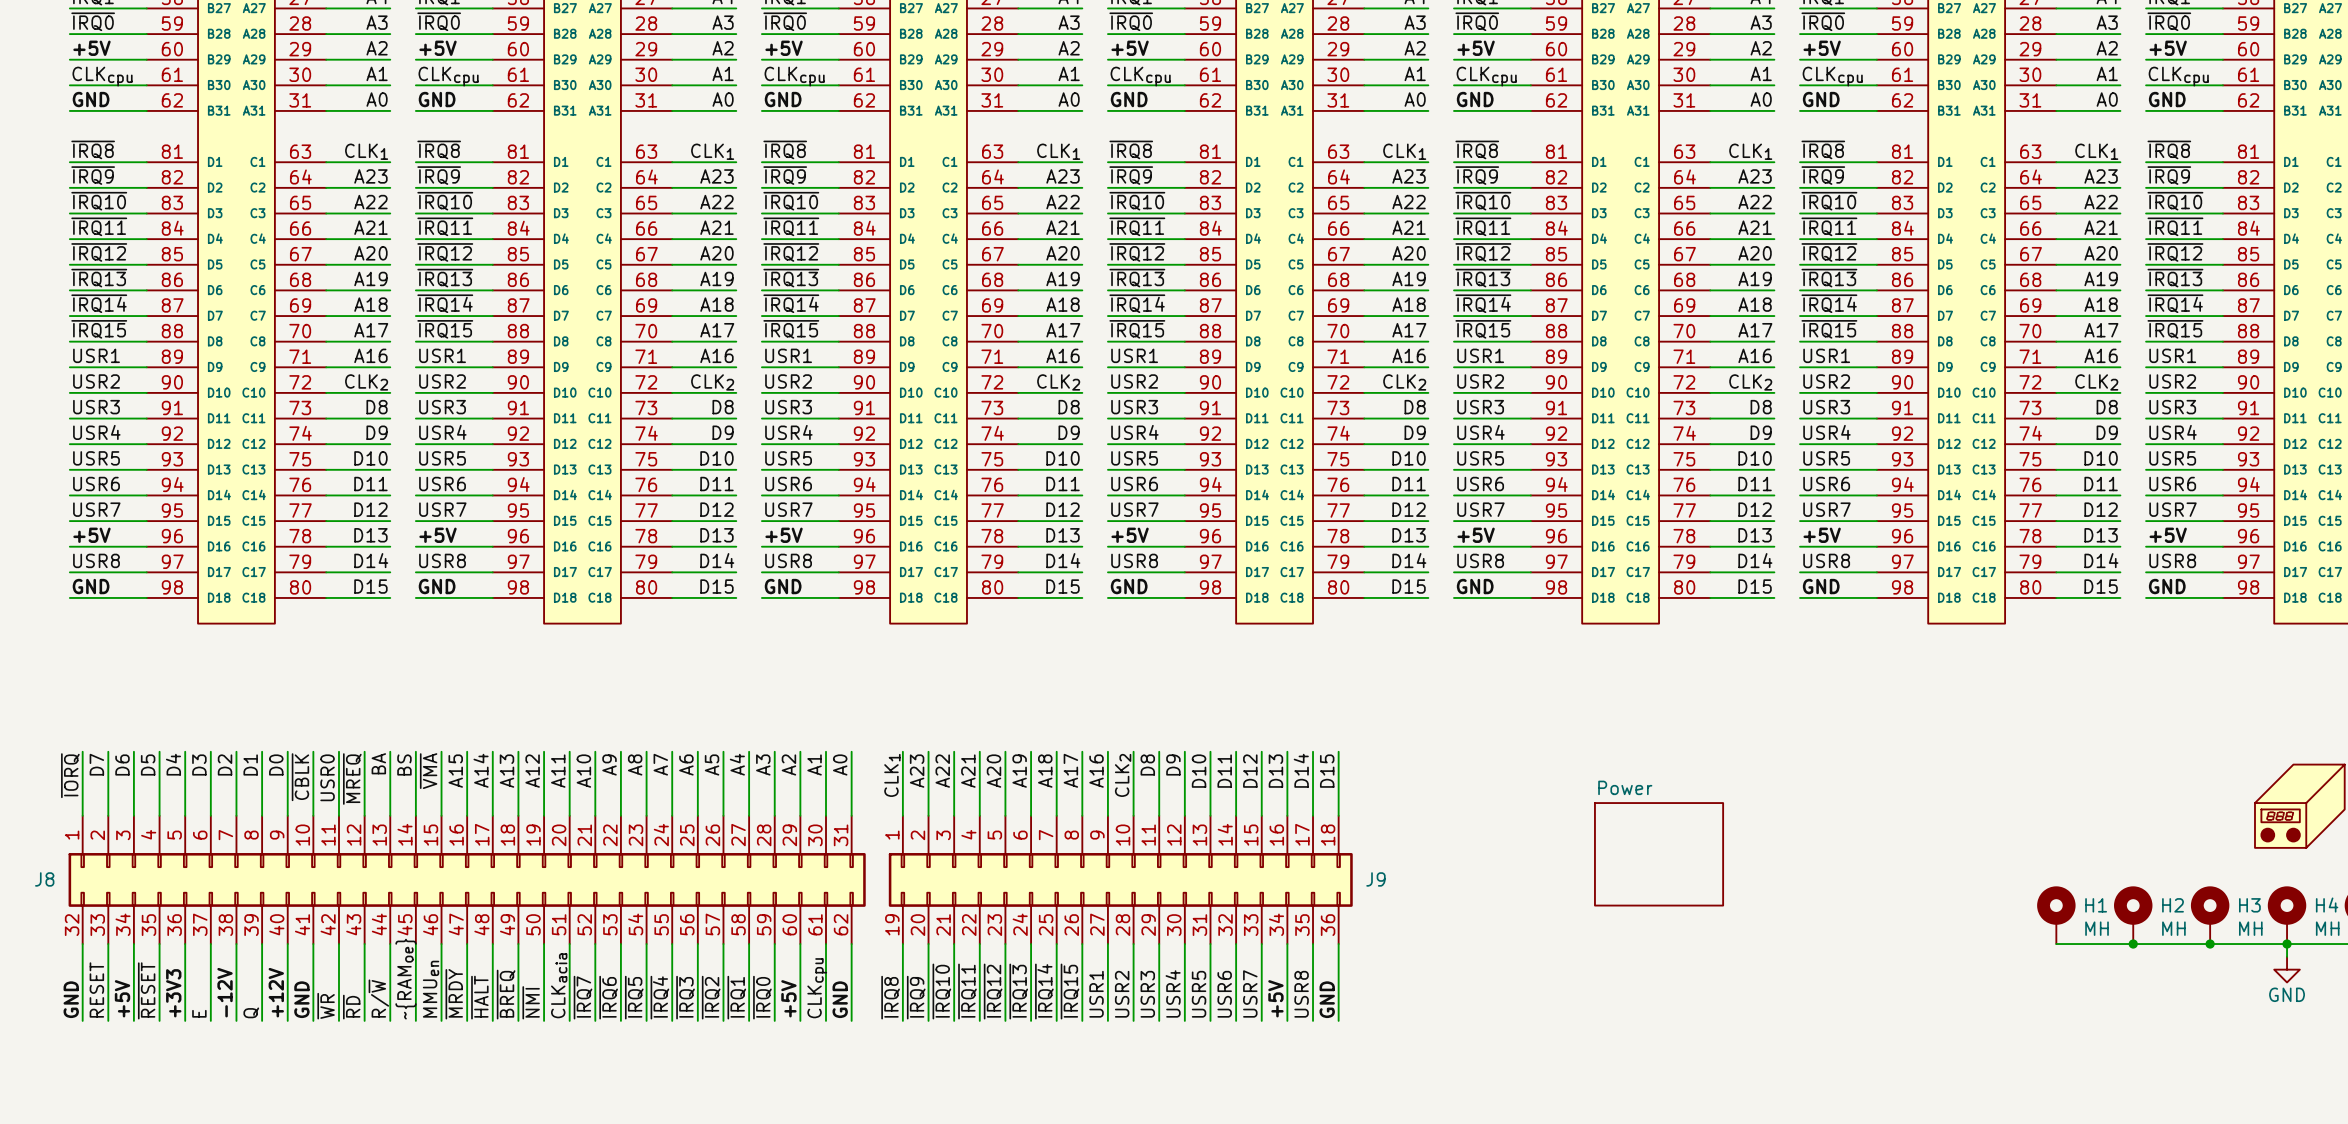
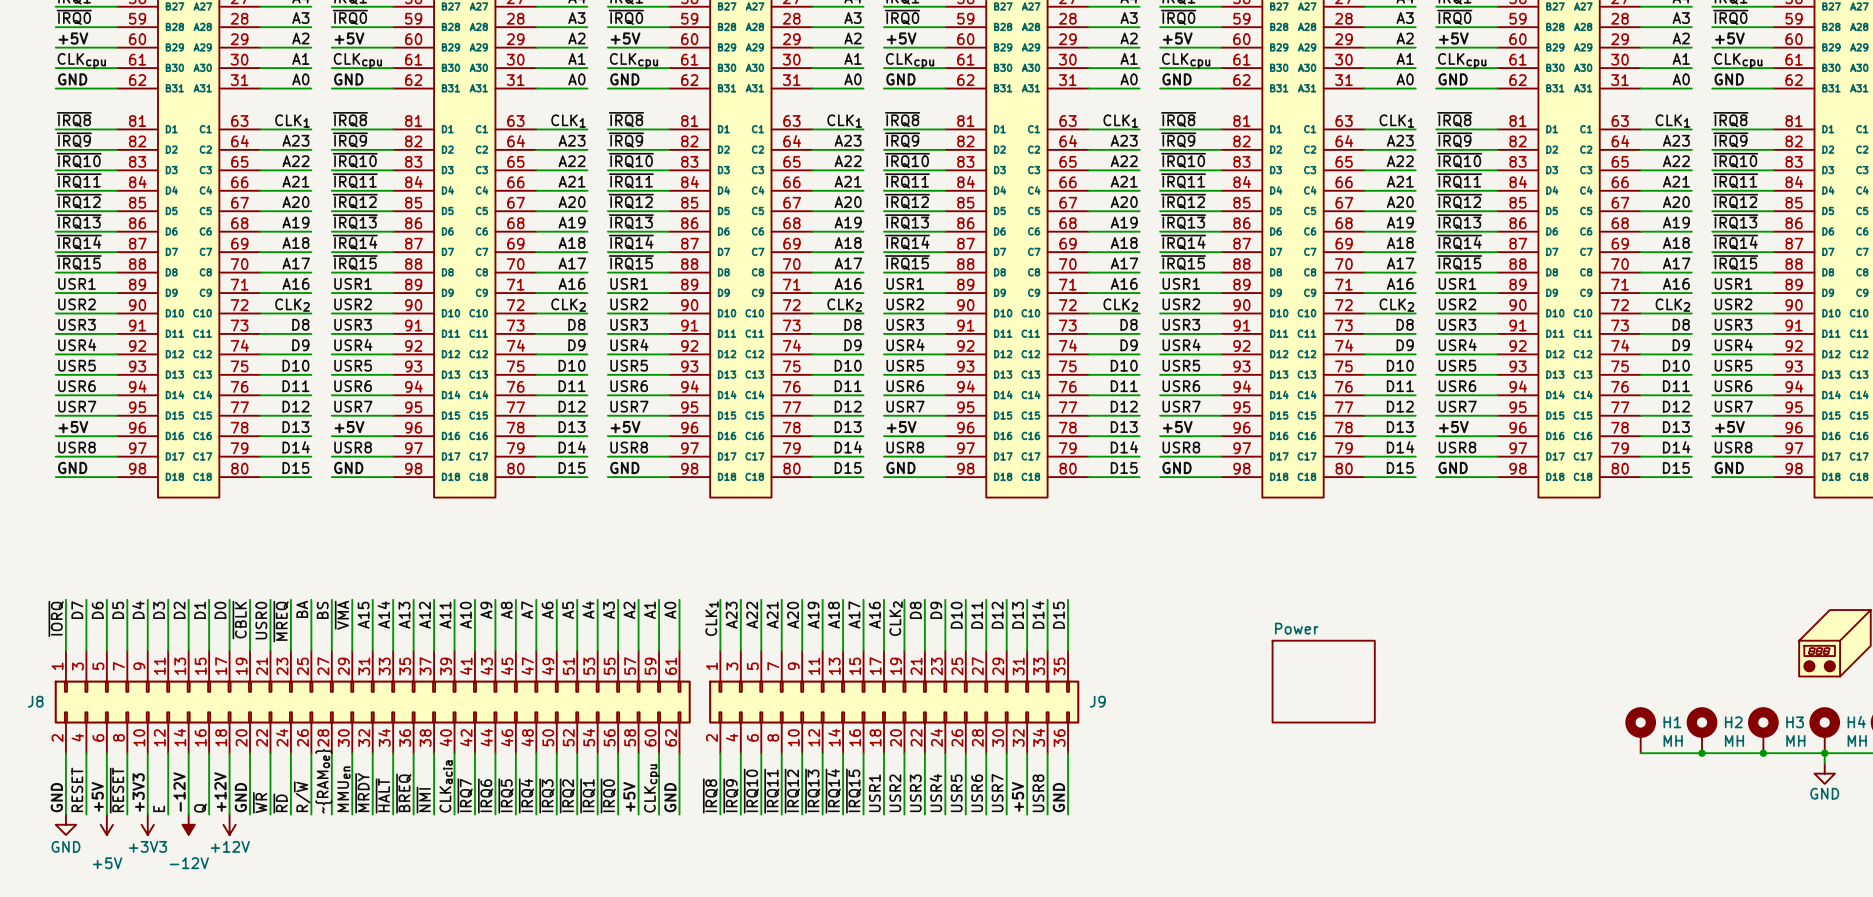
J8 symbol: [68, 815, 866, 945] -> [54, 650, 691, 754]
J9 symbol: [888, 815, 1353, 945] -> [709, 650, 1080, 754]
power symbol: none -> GND (65, 824)
power symbol: none -> +5V (106, 824)
power symbol: none -> +3V3 (147, 824)
power symbol: none -> -12V (188, 824)
power symbol: none -> +12V (229, 824)

